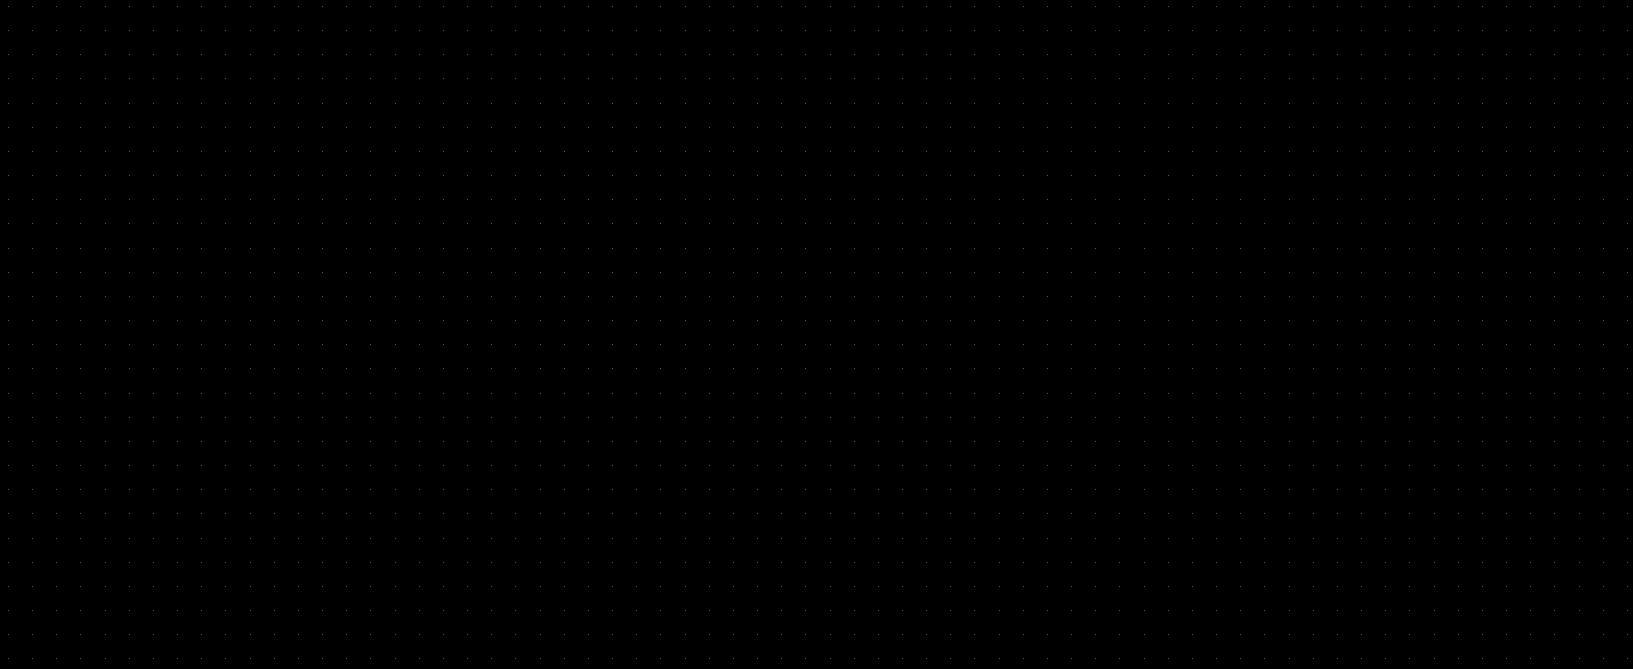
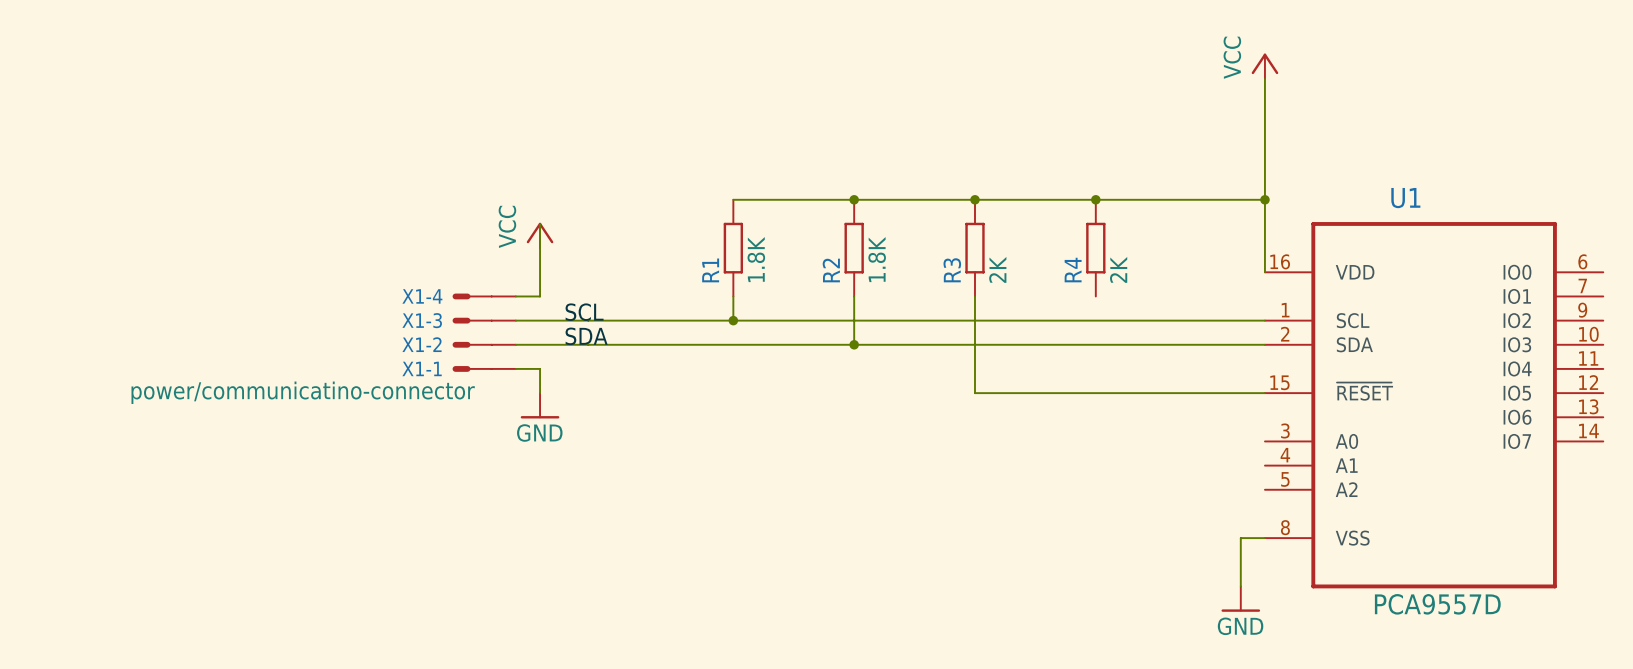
power symbol: none -> VCC (1264, 66)
wire: none -> (1264, 78) (1264, 272)
wire: none -> (733, 199) (1264, 199)
junction: none -> (854, 199)
junction: none -> (974, 199)
junction: none -> (1095, 199)
junction: none -> (1264, 199)
wire: none -> (540, 223) (540, 296) (515, 296)
power symbol: none -> VCC (540, 235)
R1: none -> 1.8K (733, 248)
R2: none -> 1.8K (854, 248)
R3: none -> 2K (974, 248)
R4: none -> 2K (1095, 248)
X1-4: none -> (484, 296)
wire: none -> (733, 296) (733, 320)
wire: none -> (854, 296) (854, 344)
wire: none -> (974, 296) (974, 393) (1264, 393)
label: none -> SCL (584, 312)
X1-3: none -> (484, 320)
wire: none -> (515, 320) (1264, 320)
junction: none -> (733, 320)
label: none -> SDA (586, 336)
X1-2: none -> (484, 344)
wire: none -> (515, 344) (1264, 344)
junction: none -> (854, 344)
X1-1: none -> power/communicatino-connector (484, 368)
wire: none -> (515, 368) (540, 368) (540, 393)
power symbol: none -> GND (540, 405)
U1: none -> PCA9557D (1434, 405)
wire: none -> (1264, 538) (1240, 538) (1240, 586)
power symbol: none -> GND (1240, 599)

